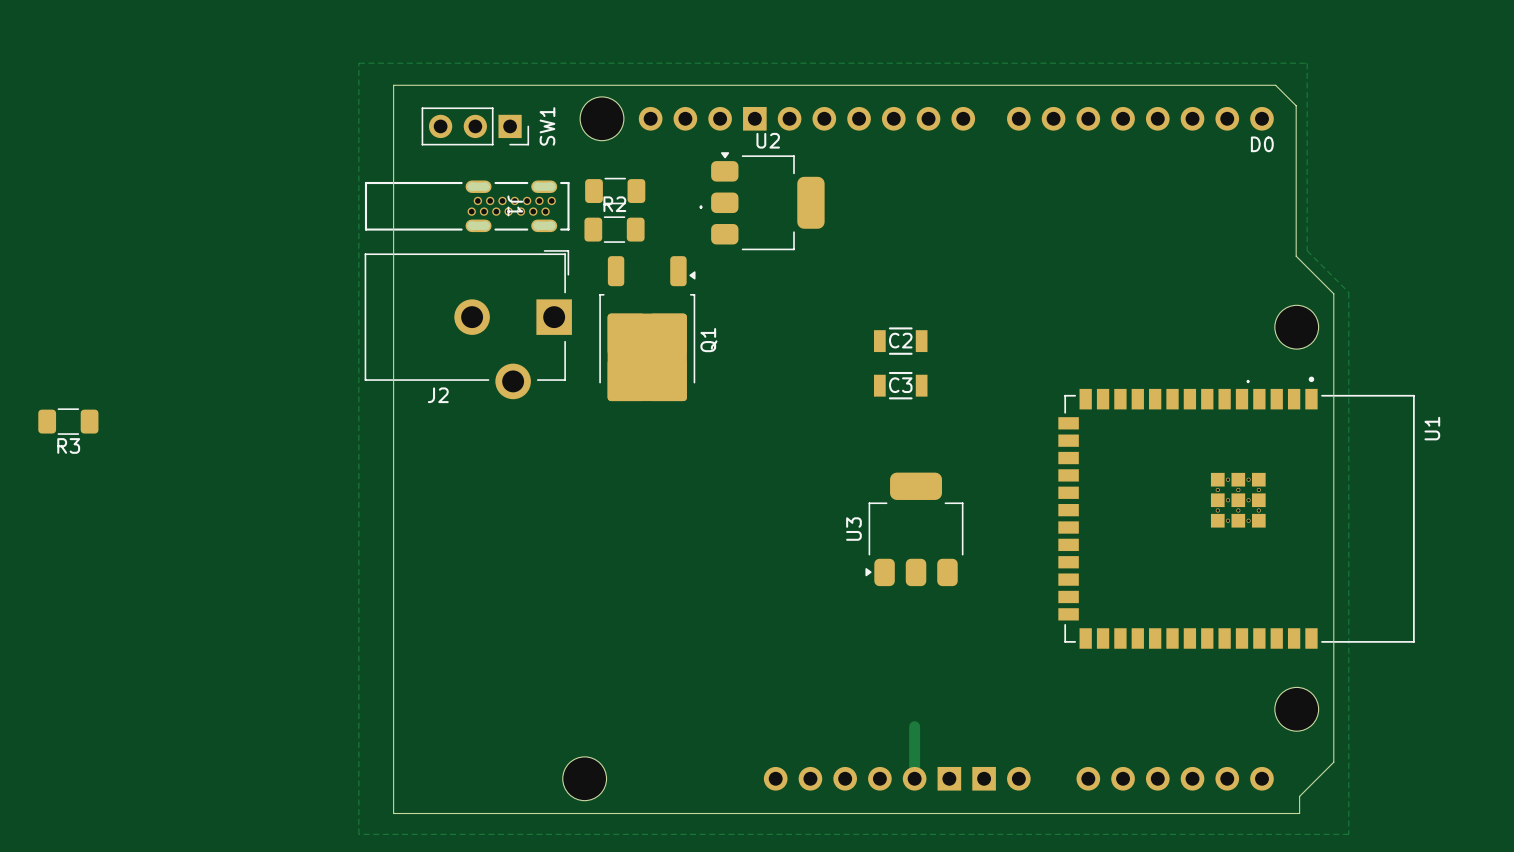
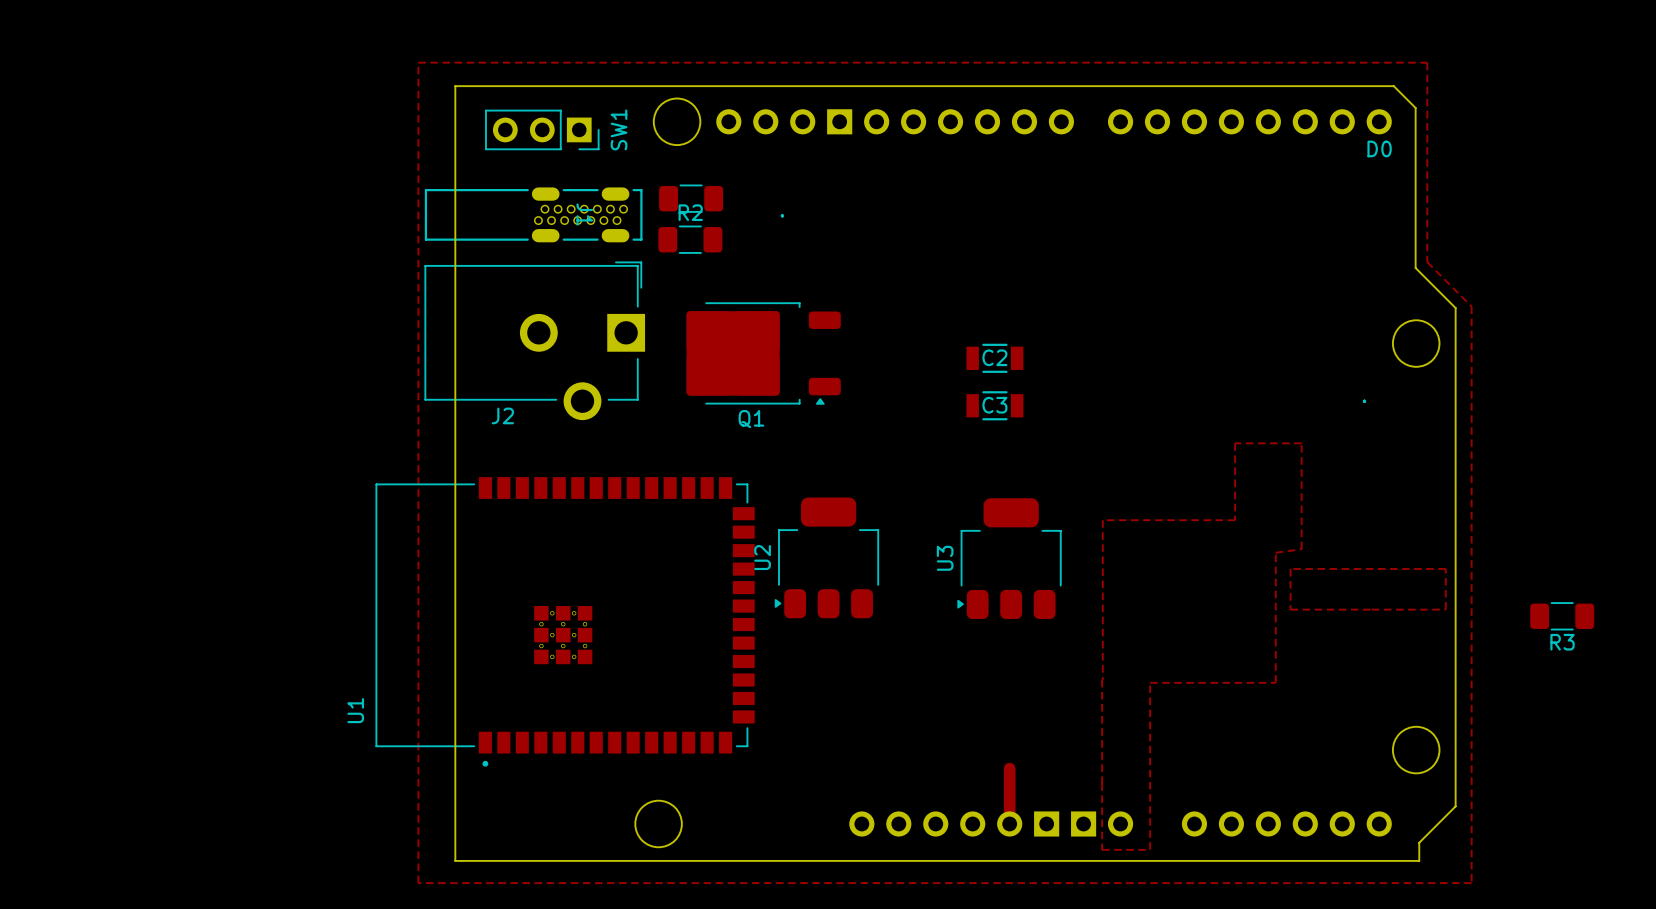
U2 rotation: 0° (767, 201) -> 90° counterclockwise (826, 557)
U2 position: (767, 201) -> (826, 557)
Q1 rotation: 0° (647, 328) -> 90° clockwise (763, 353)
zone outline: none -> (1235, 443) (1301, 443) (1301, 549) (1275, 552) (1275, 682) (1150, 682) (1150, 849) (1102, 849) (1102, 520) (1235, 520) (1235, 443)
R3 position: (68, 421) -> (1562, 616)
U1 rotation: 0° (1236, 512) -> 180° (565, 621)
U1 position: (1236, 512) -> (565, 621)
zone outline: none -> (1290, 568) (1445, 568) (1445, 609) (1290, 609) (1290, 568)

